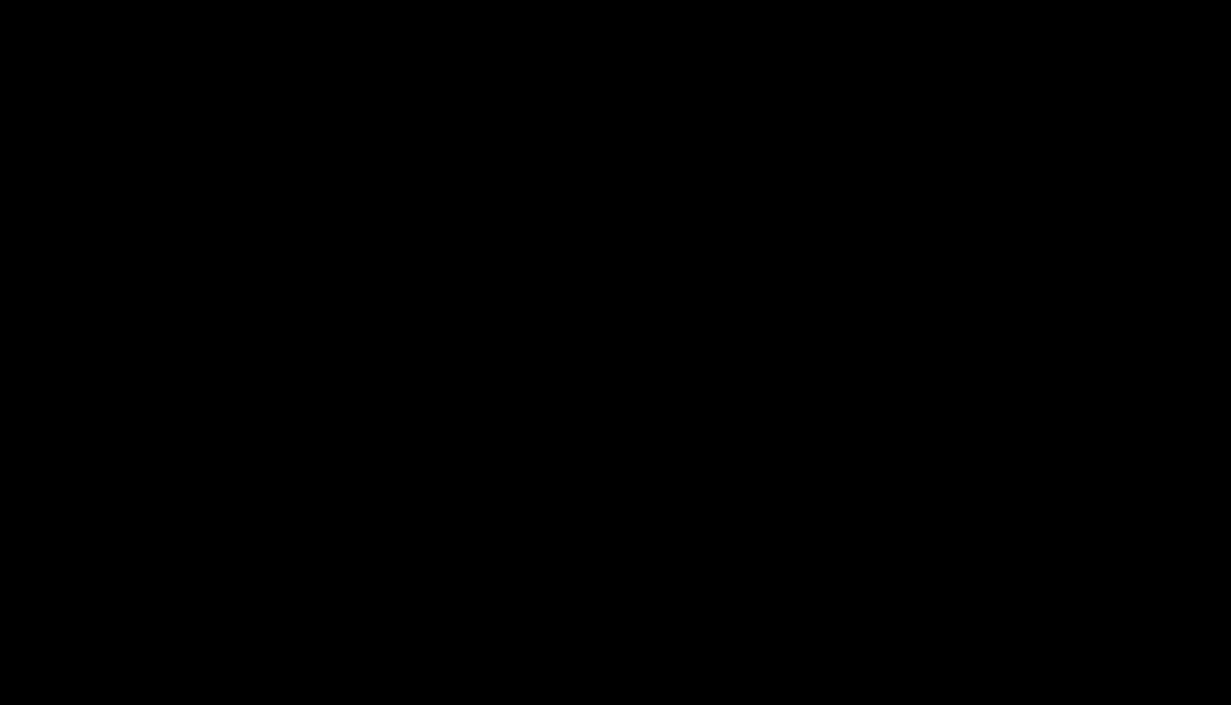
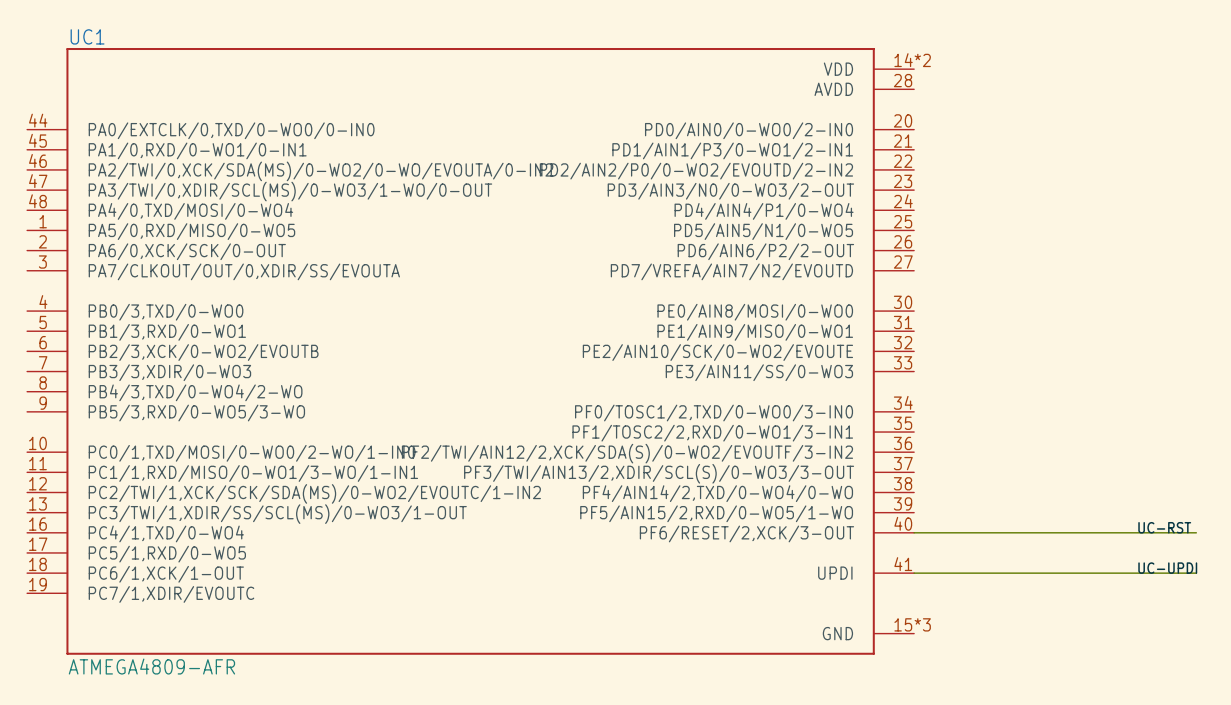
UC1: none -> ATMEGA4809-AFR (470, 351)
label: none -> UC-RST (1164, 527)
wire: none -> (914, 532) (1196, 532)
label: none -> UC-UPDI (1167, 568)
wire: none -> (914, 573) (1196, 573)

